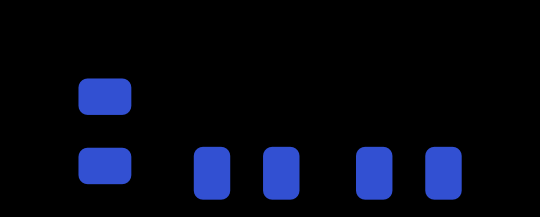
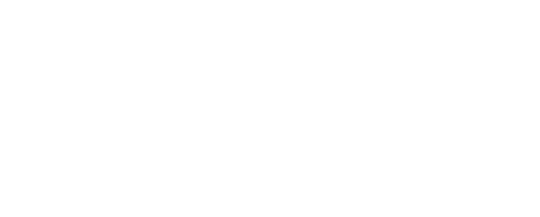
part: (104, 131) -> none
part: (246, 173) -> none
part: (408, 173) -> none

